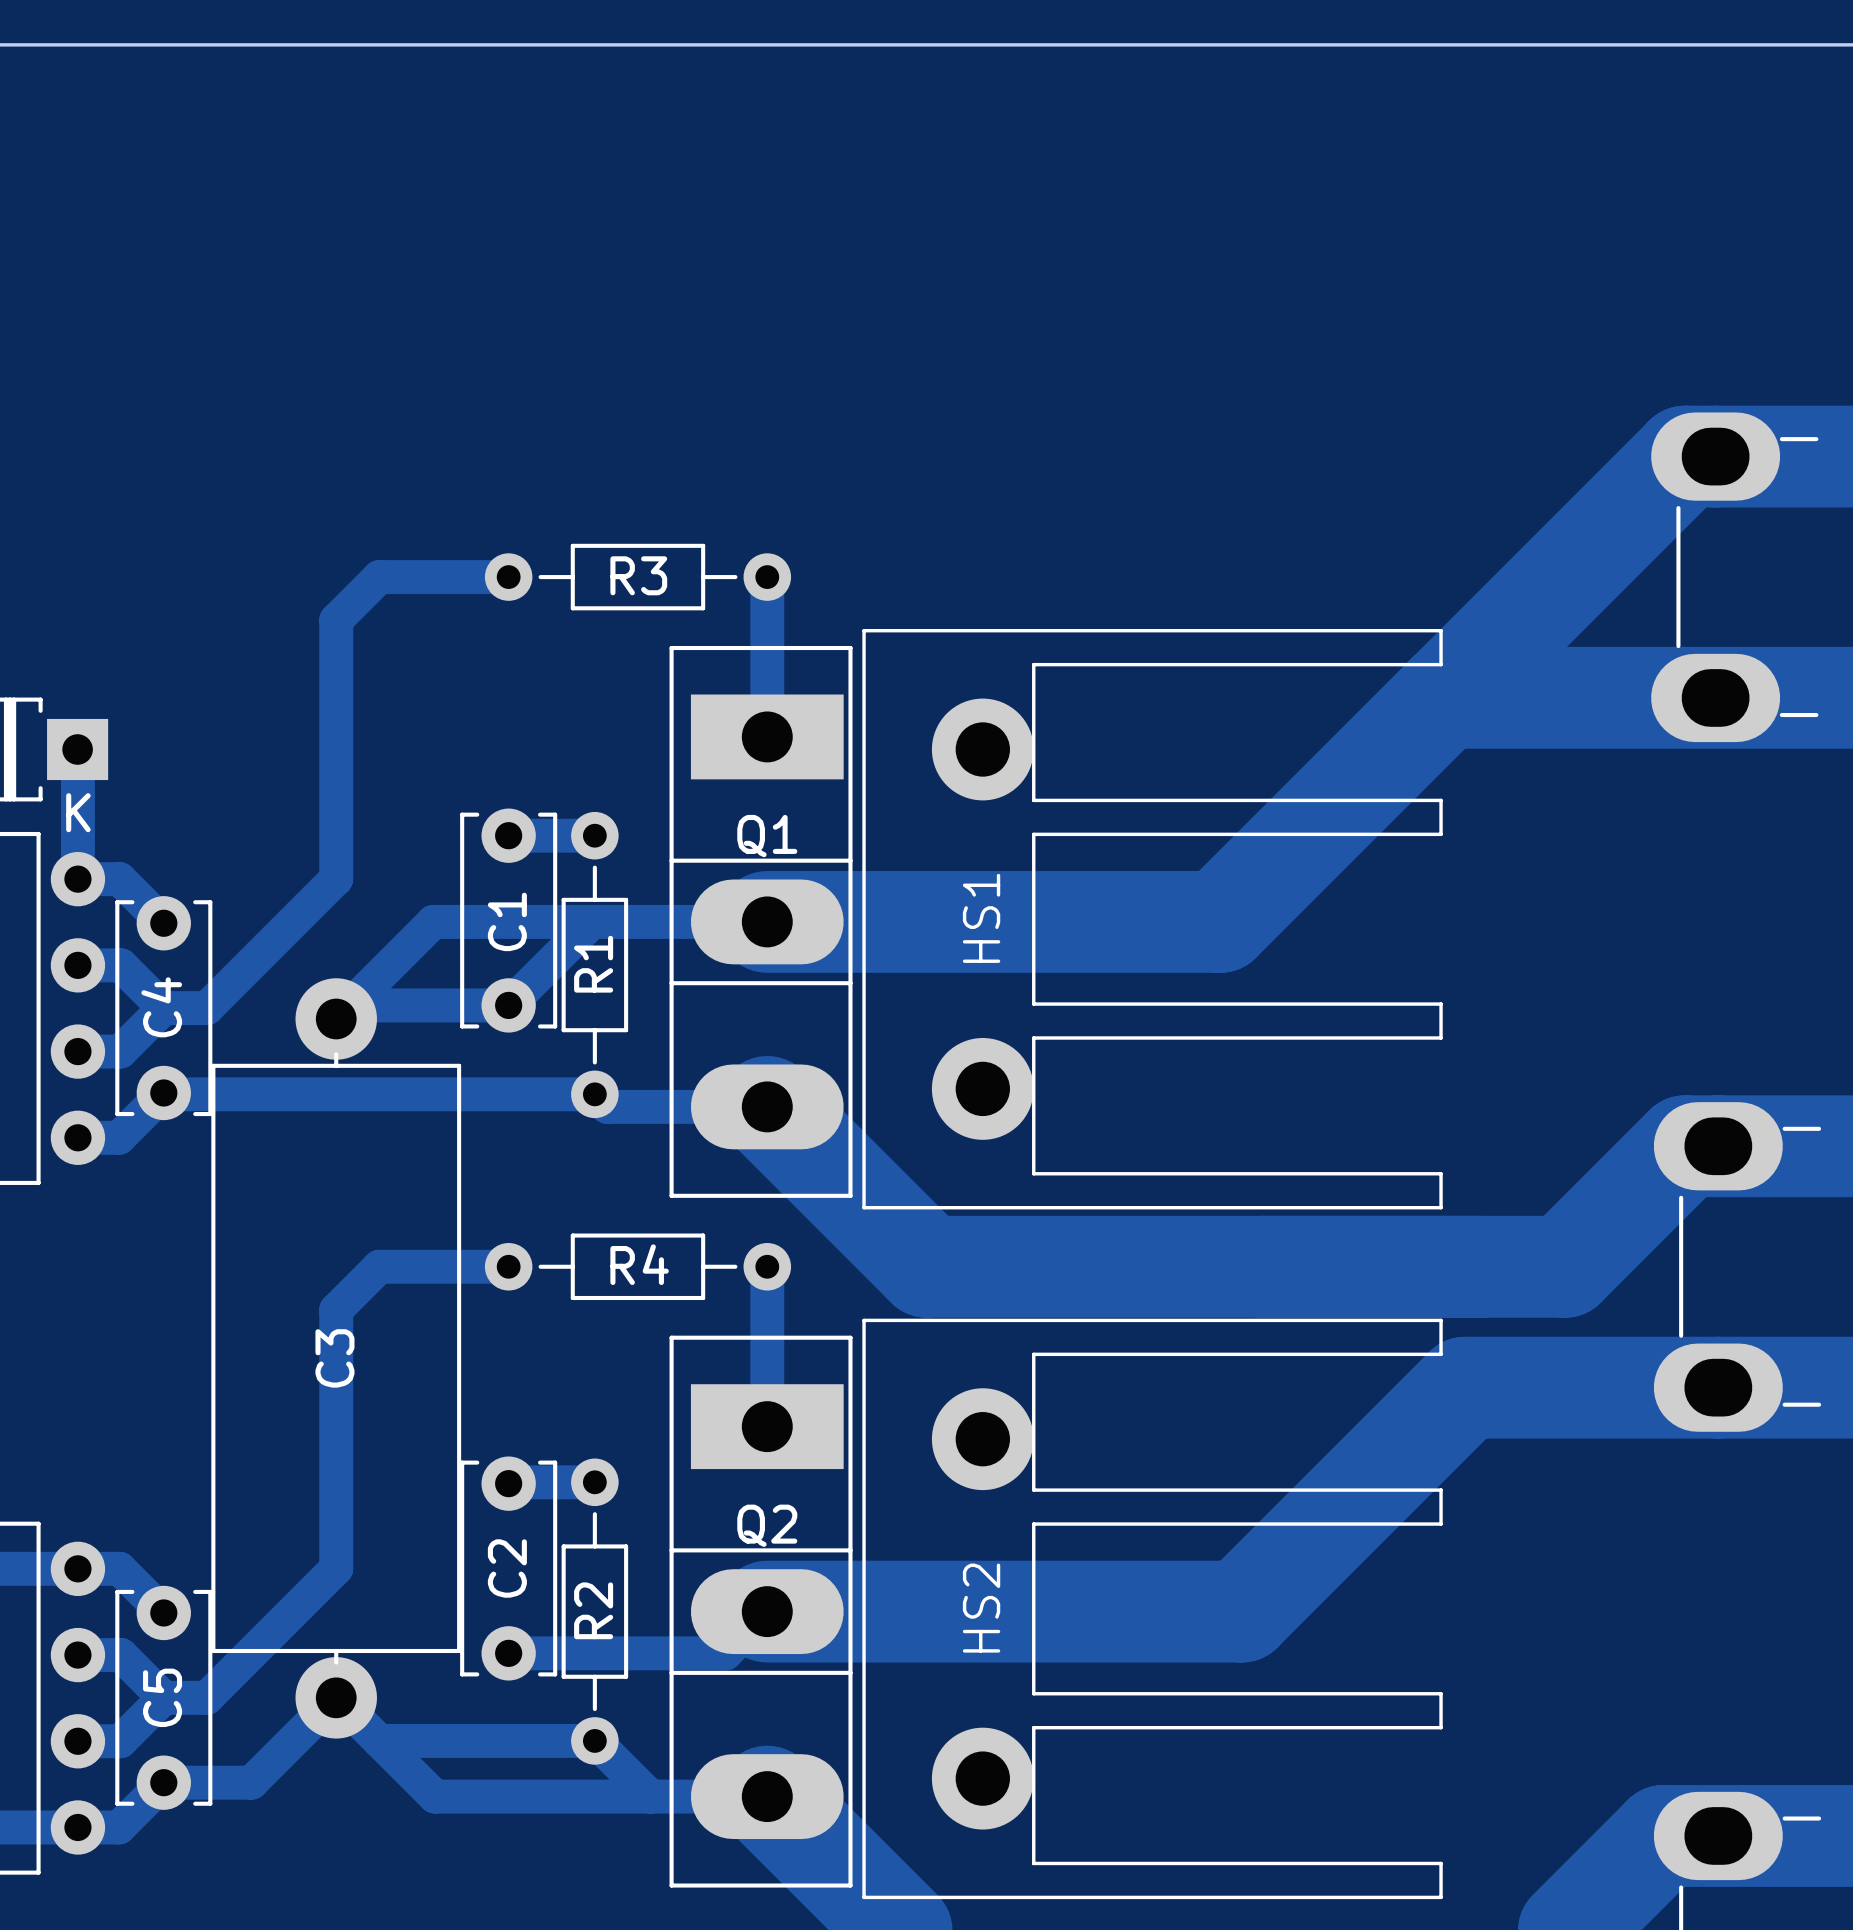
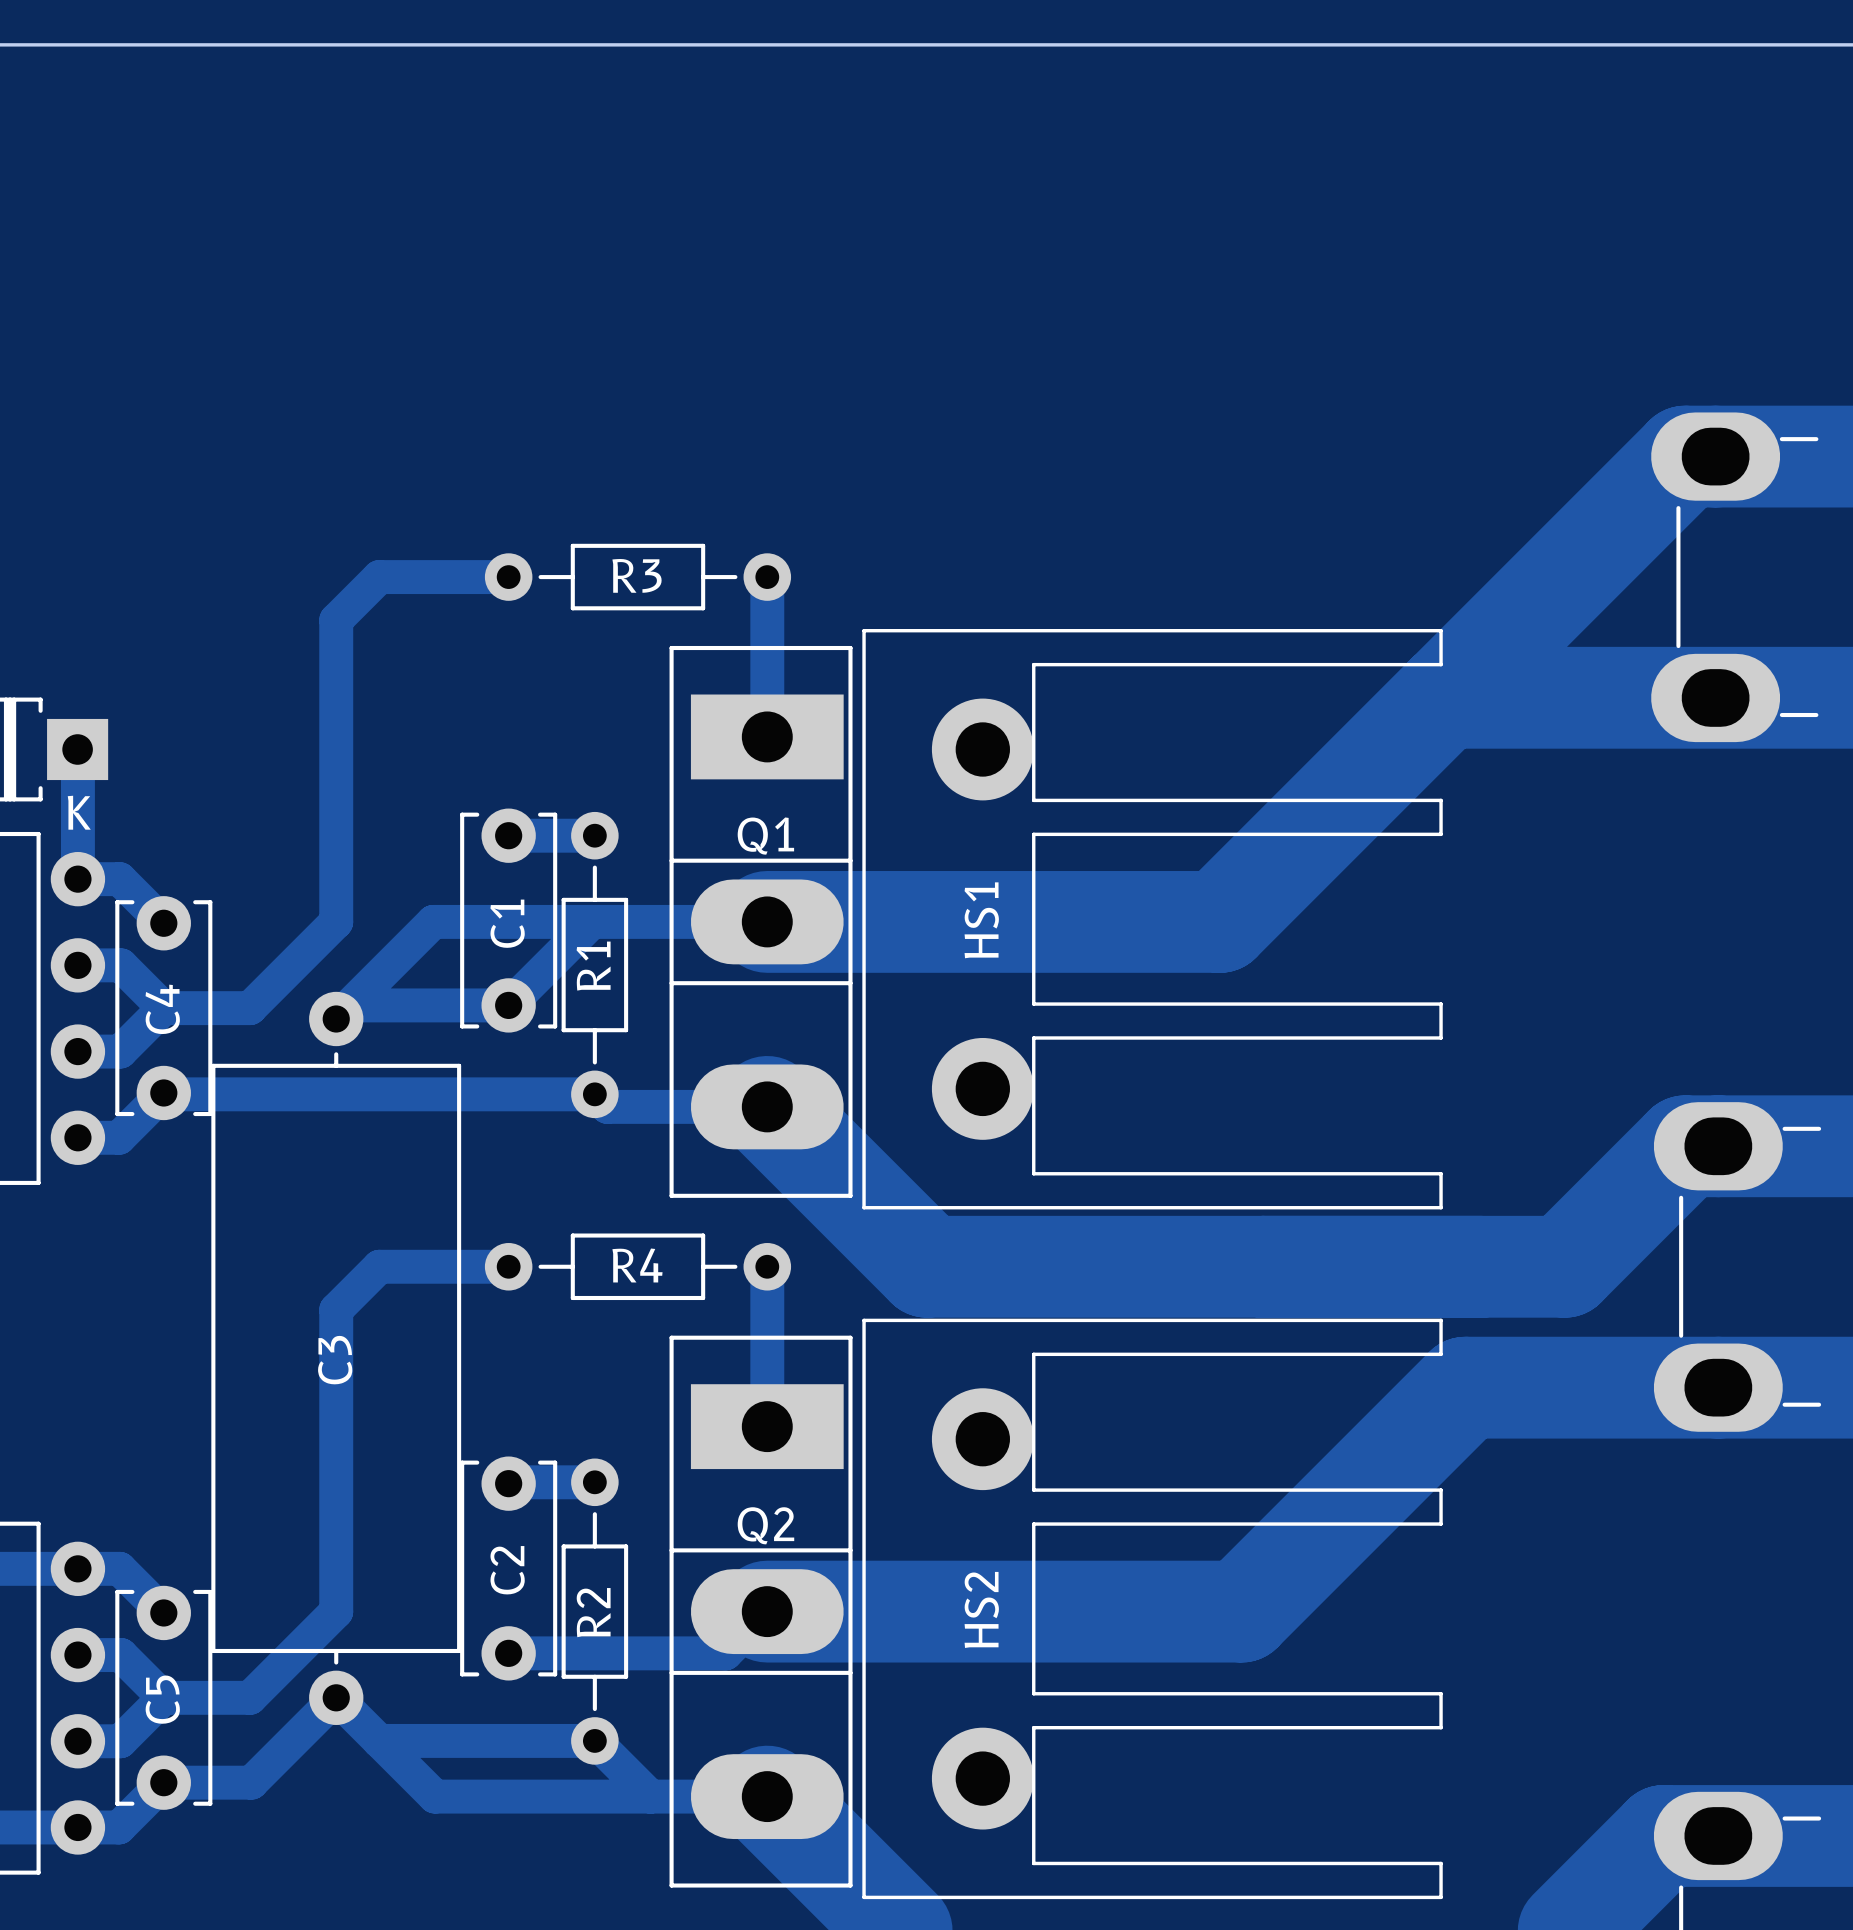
track: (336, 878) (206, 1008) -> (336, 878) (336, 921) (250, 1008) (206, 1008)
C3 footprint: [211, 978, 462, 1739] -> [211, 991, 462, 1725]
track: (336, 1568) (206, 1697) -> (336, 1568) (336, 1611) (250, 1697) (206, 1697)

